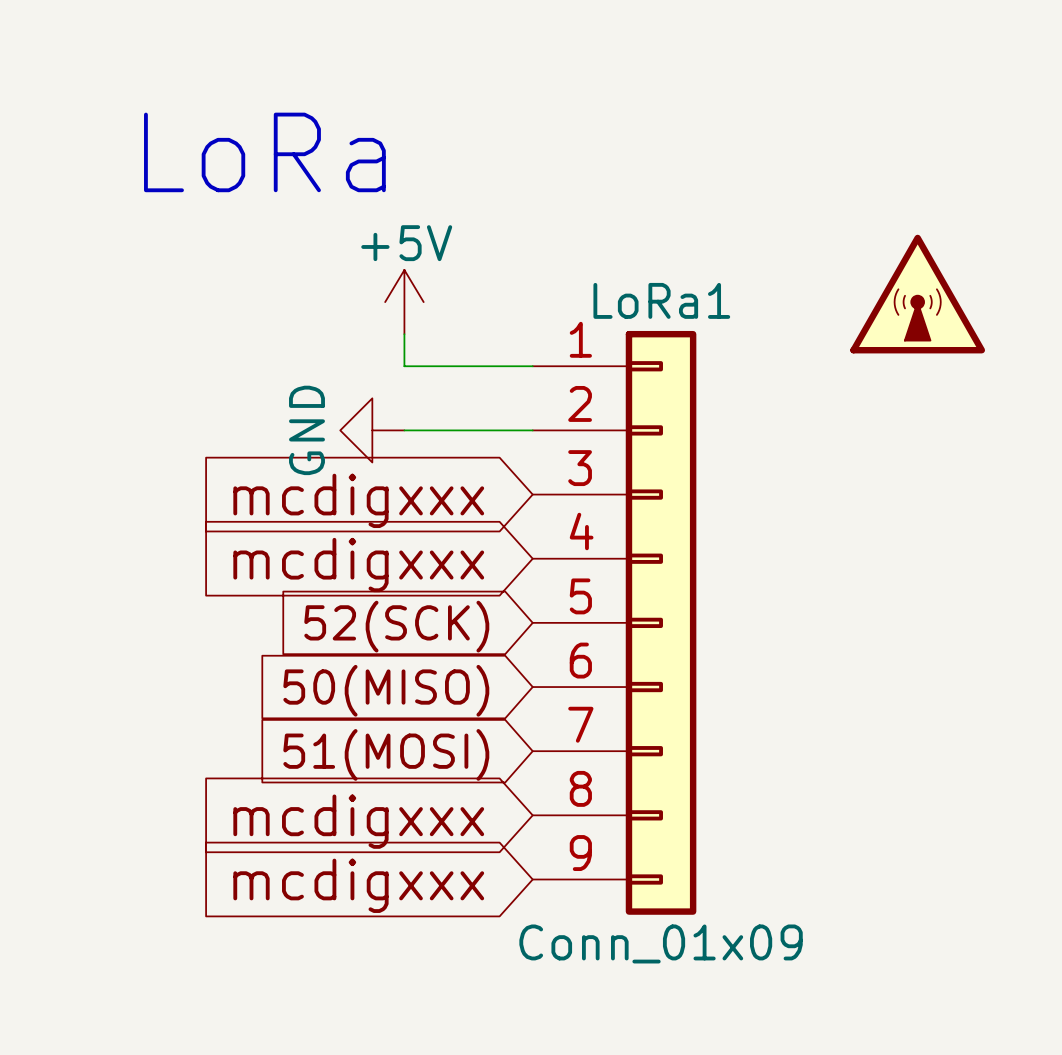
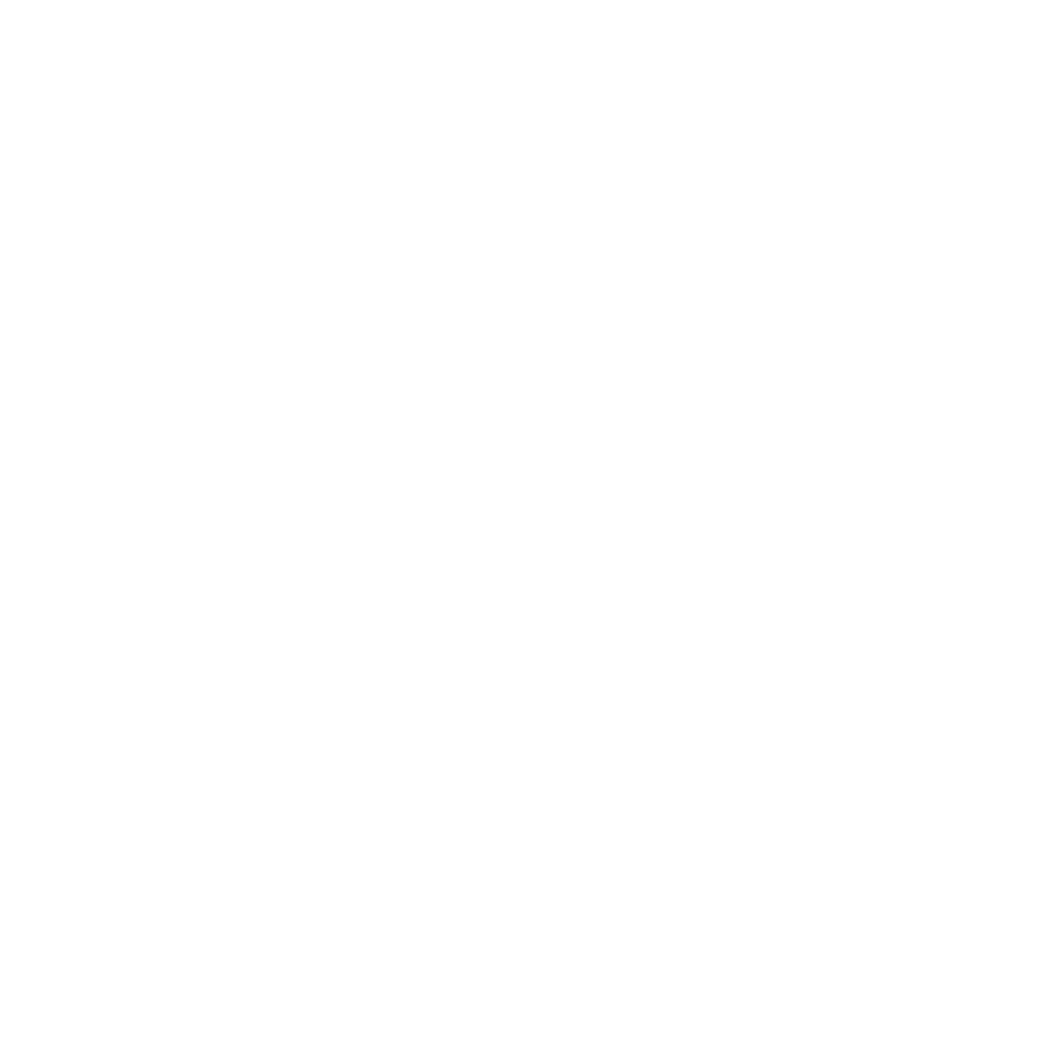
text: LoRa (264, 152) -> none
power symbol: (917, 294) -> none
power symbol: +5V (404, 302) -> none
wire: (404, 334) (404, 366) (532, 366) -> none
power symbol: GND (372, 430) -> none
wire: (404, 430) (532, 430) -> none
global label: mcdigxxx (358, 500) -> none
global label: mcdigxxx (358, 565) -> none
LoRa1: Conn_01x09 (614, 622) -> none
global label: 52(SCK) (396, 626) -> none
global label: 50(MISO) (386, 690) -> none
global label: 51(MOSI) (386, 754) -> none
global label: mcdigxxx (358, 821) -> none
global label: mcdigxxx (358, 885) -> none

